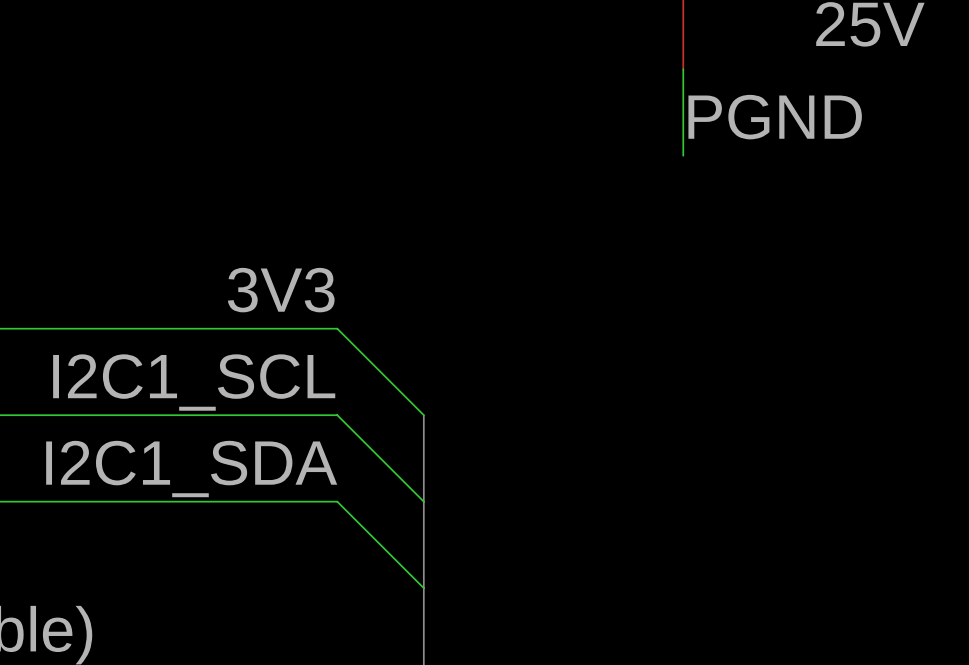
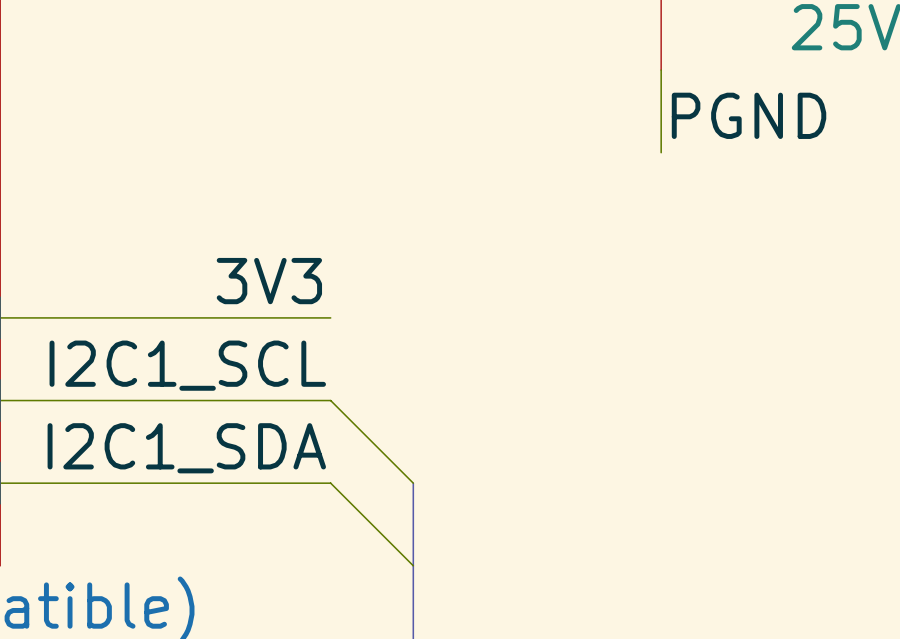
wire: (337, 328) (423, 415) -> none
bus: (423, 415) (423, 501) -> none

